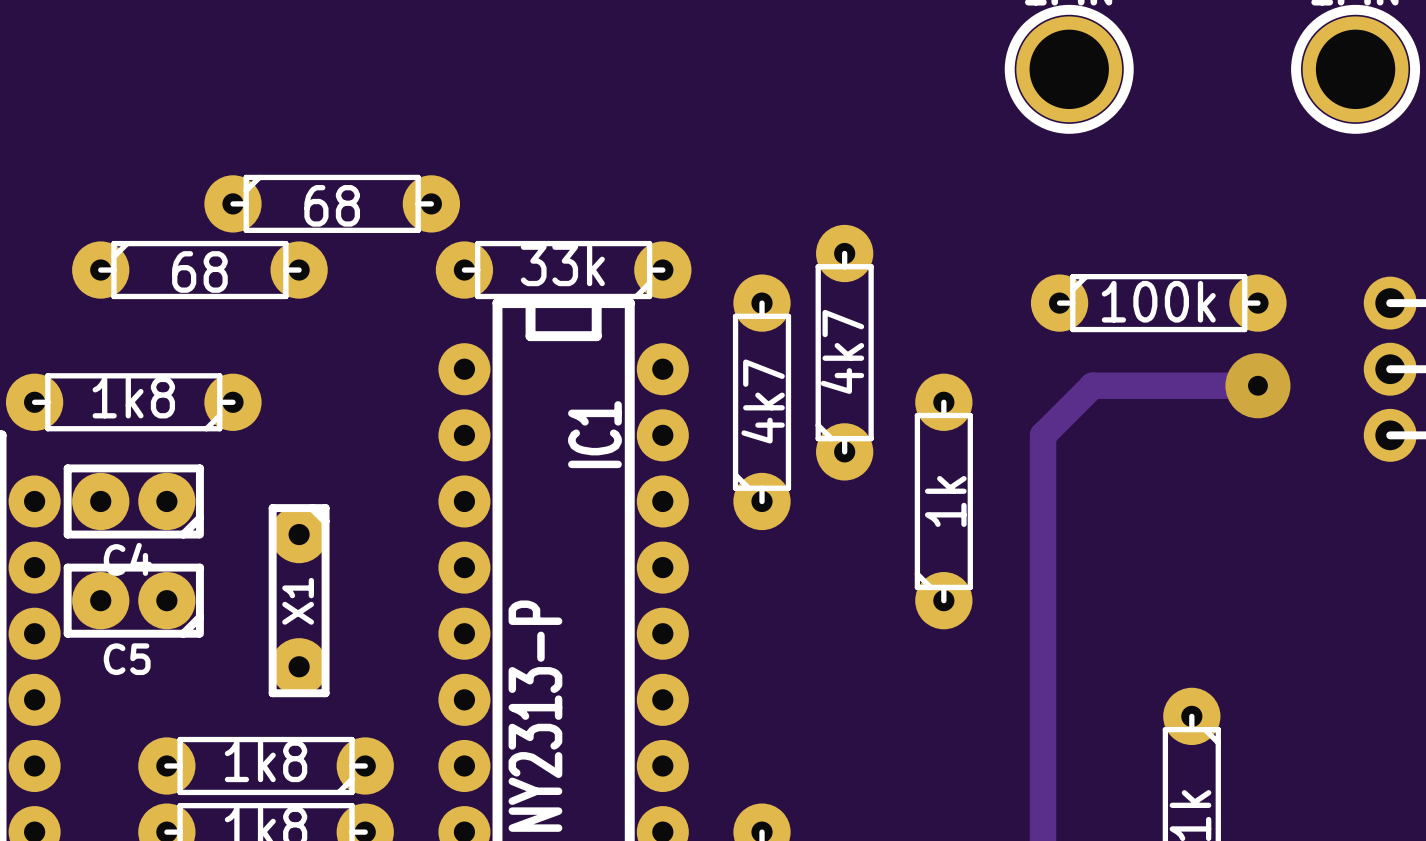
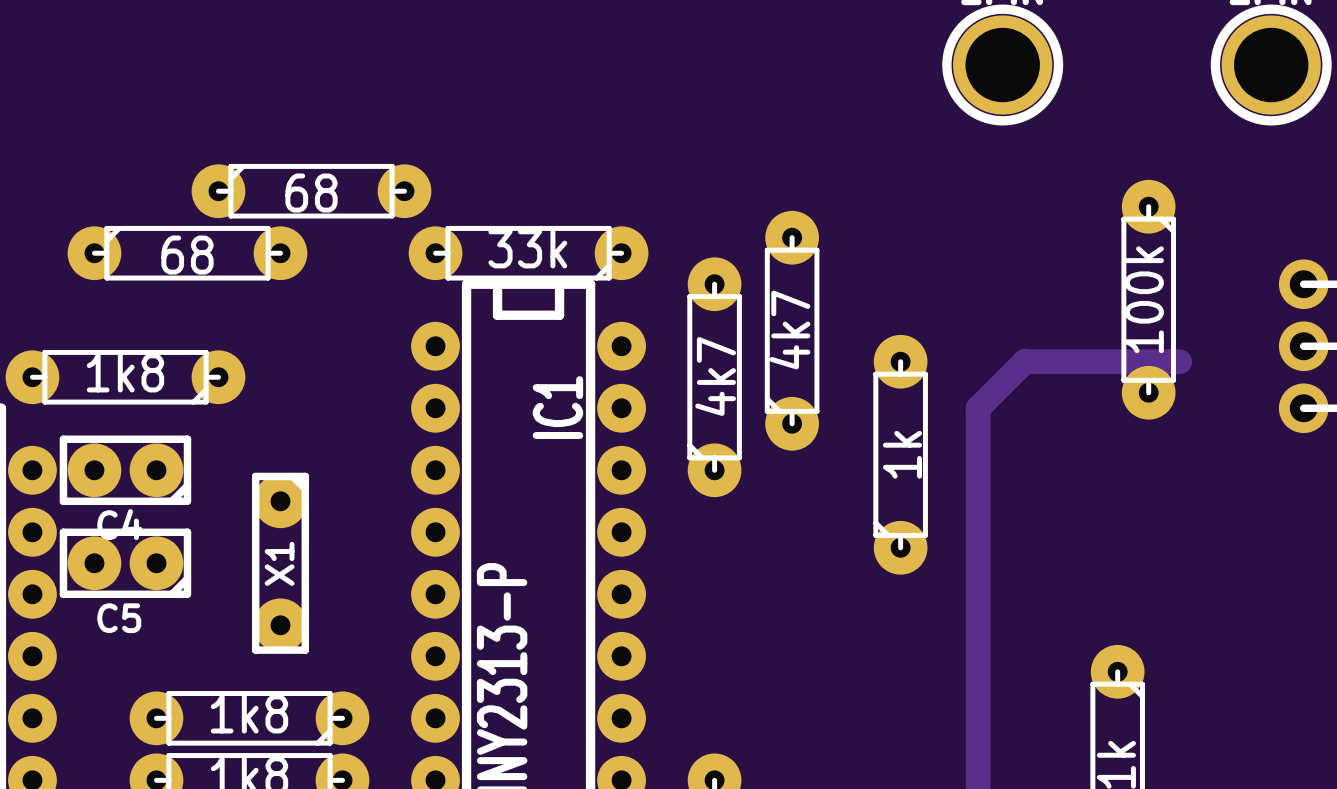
part rotation: 0° (1158, 303) -> 90° clockwise (1148, 299)
via: (1257, 385) -> none
part position: (943, 501) -> (900, 454)

